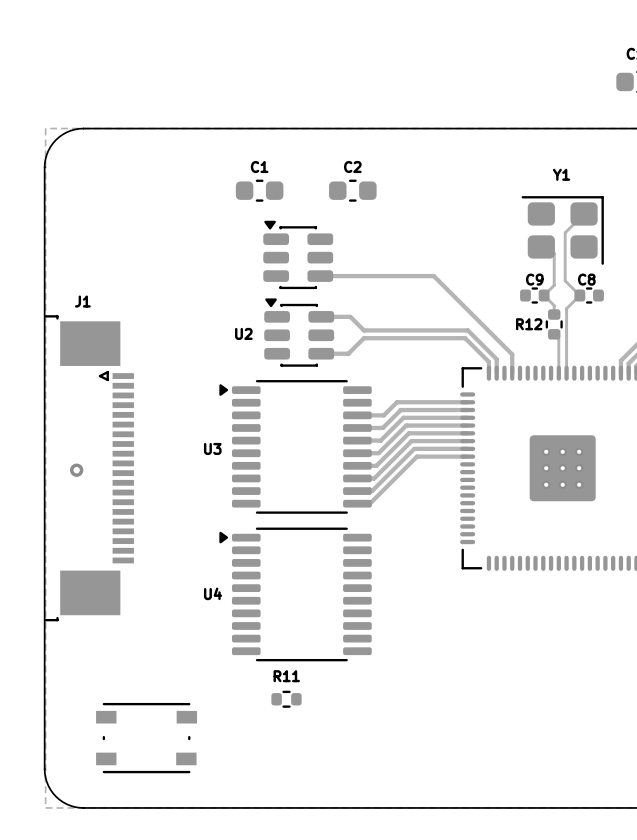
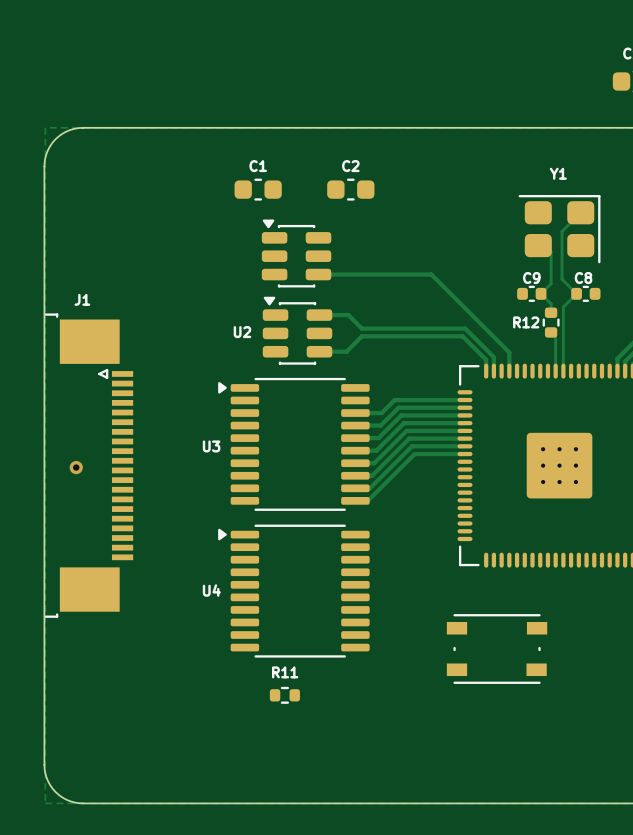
part position: (146, 738) -> (497, 649)

